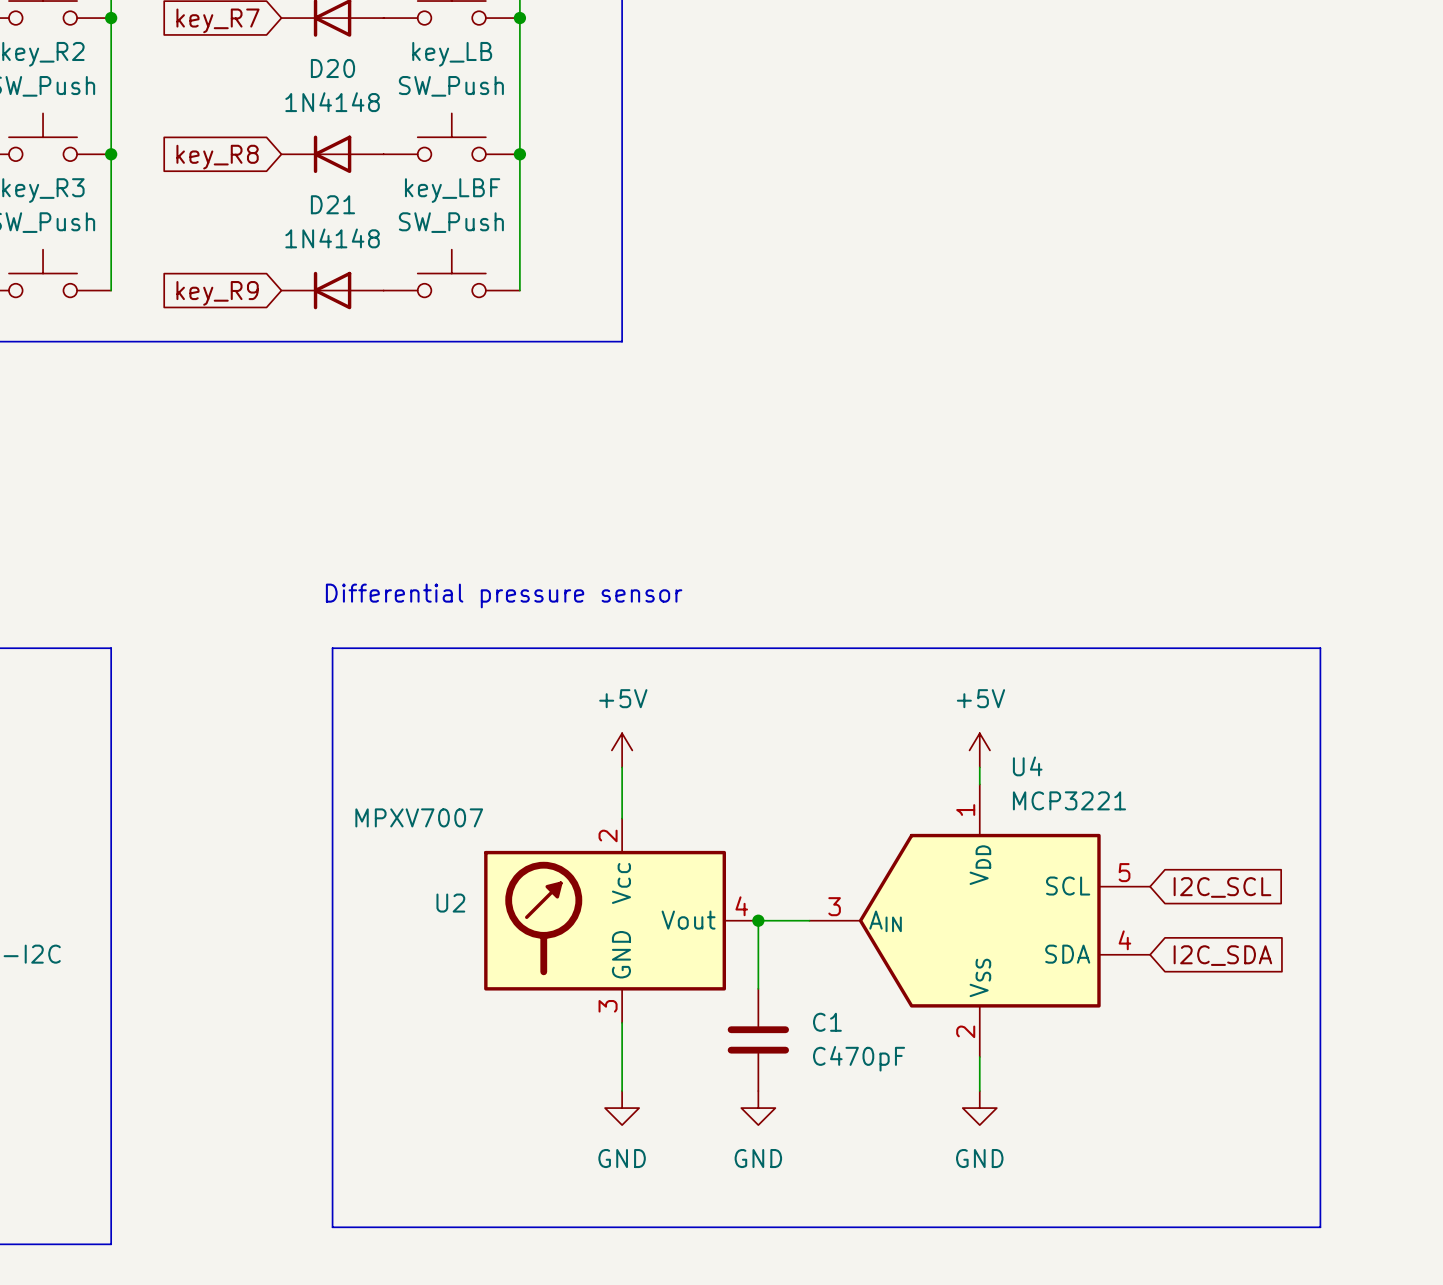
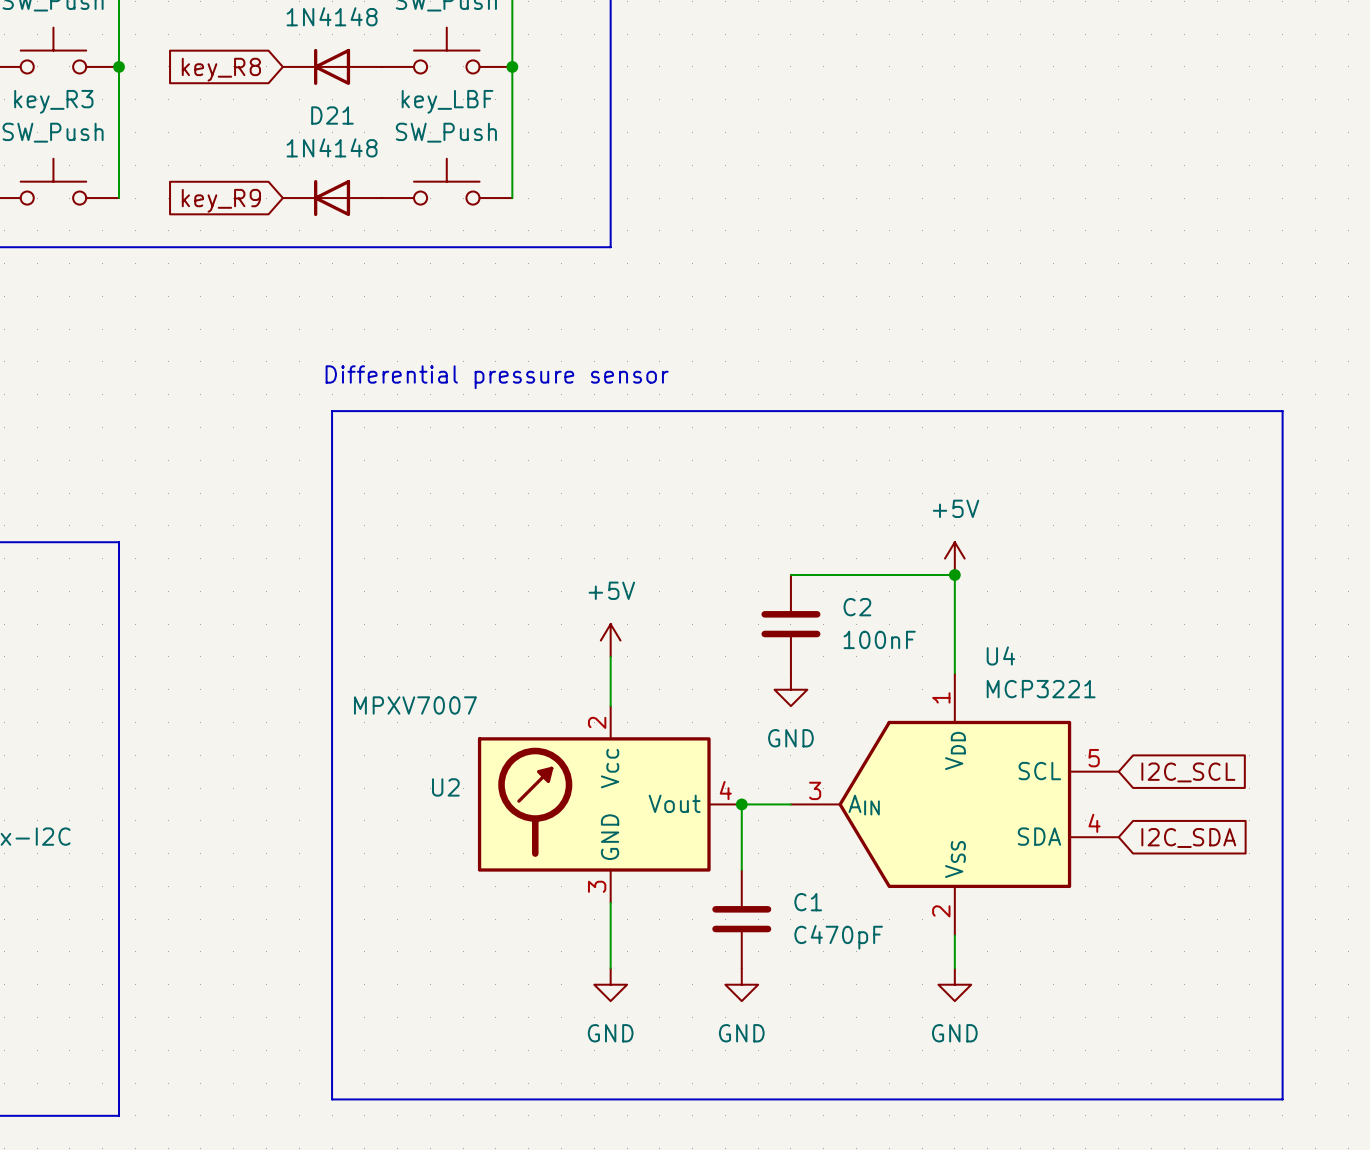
text position: Differential pressure sensor (504, 595) -> Differential pressure sensor (497, 377)
line: (332, 648) (1320, 648) -> (332, 542) (332, 411) (1282, 411) (1282, 542)
wire: none -> (790, 574) (954, 574) (954, 656)
junction: none -> (954, 574)
C2: none -> 100nF (790, 624)
power symbol position: +5V (979, 750) -> +5V (954, 558)
power symbol: none -> GND (790, 689)

